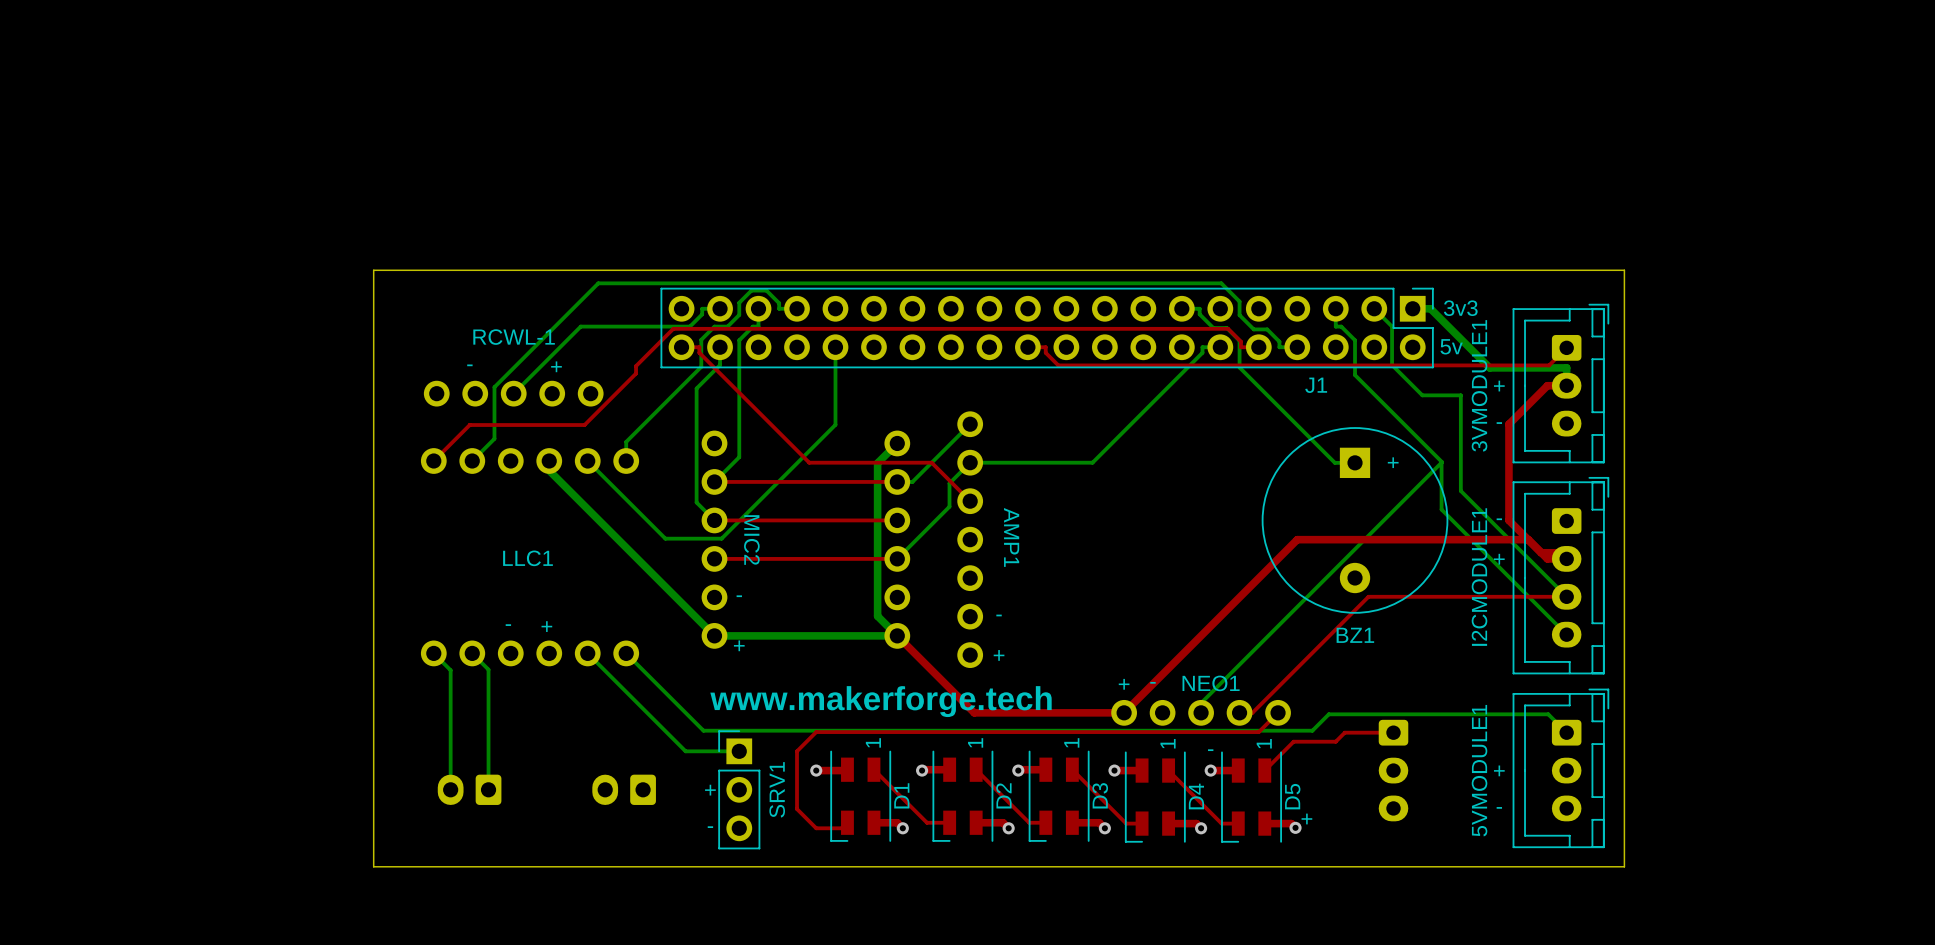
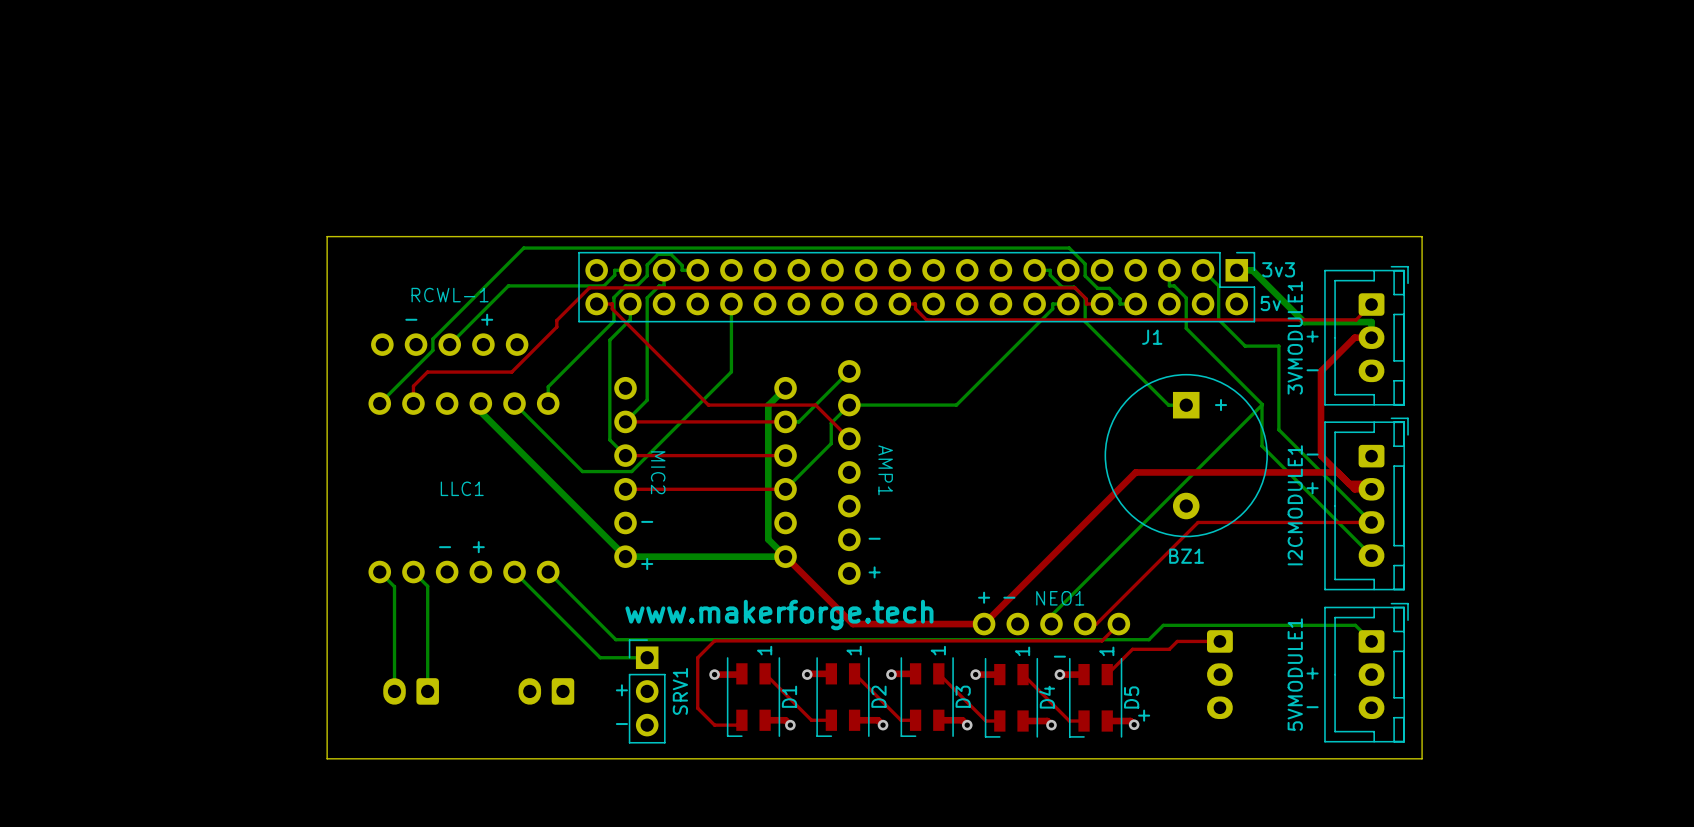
bottom track: (494, 400) (494, 438) (472, 461) -> (432, 350) (379, 403)
top track: (488, 425) (469, 425) (433, 461) -> (427, 372) (413, 386) (413, 403)

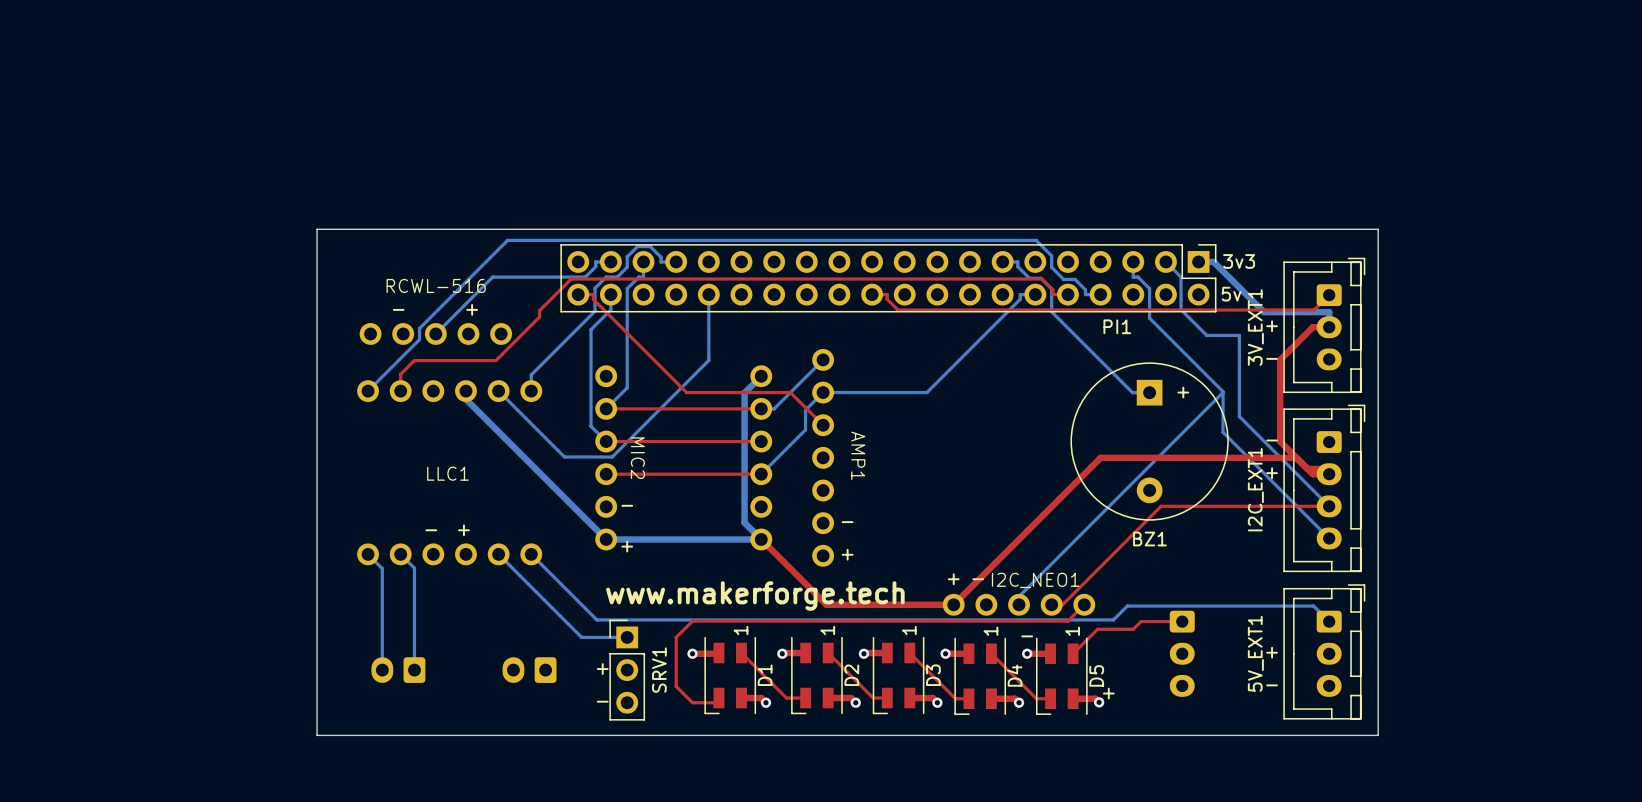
RCWL-1 name: RCWL-1 (450, 295) -> RCWL-516 (436, 285)
J1 name: J1 (1152, 337) -> PI1 (1117, 326)
3VMODULE1 name: 3VMODULE1 (1295, 338) -> 3V_EXT1 (1255, 327)
I2CMODULE1 name: I2CMODULE1 (1295, 505) -> I2C_EXT1 (1255, 489)
NEO1 name: NEO1 (1060, 598) -> I2C_NEO1 (1035, 580)
5VMODULE1 name: 5VMODULE1 (1295, 674) -> 5V_EXT1 (1255, 653)

